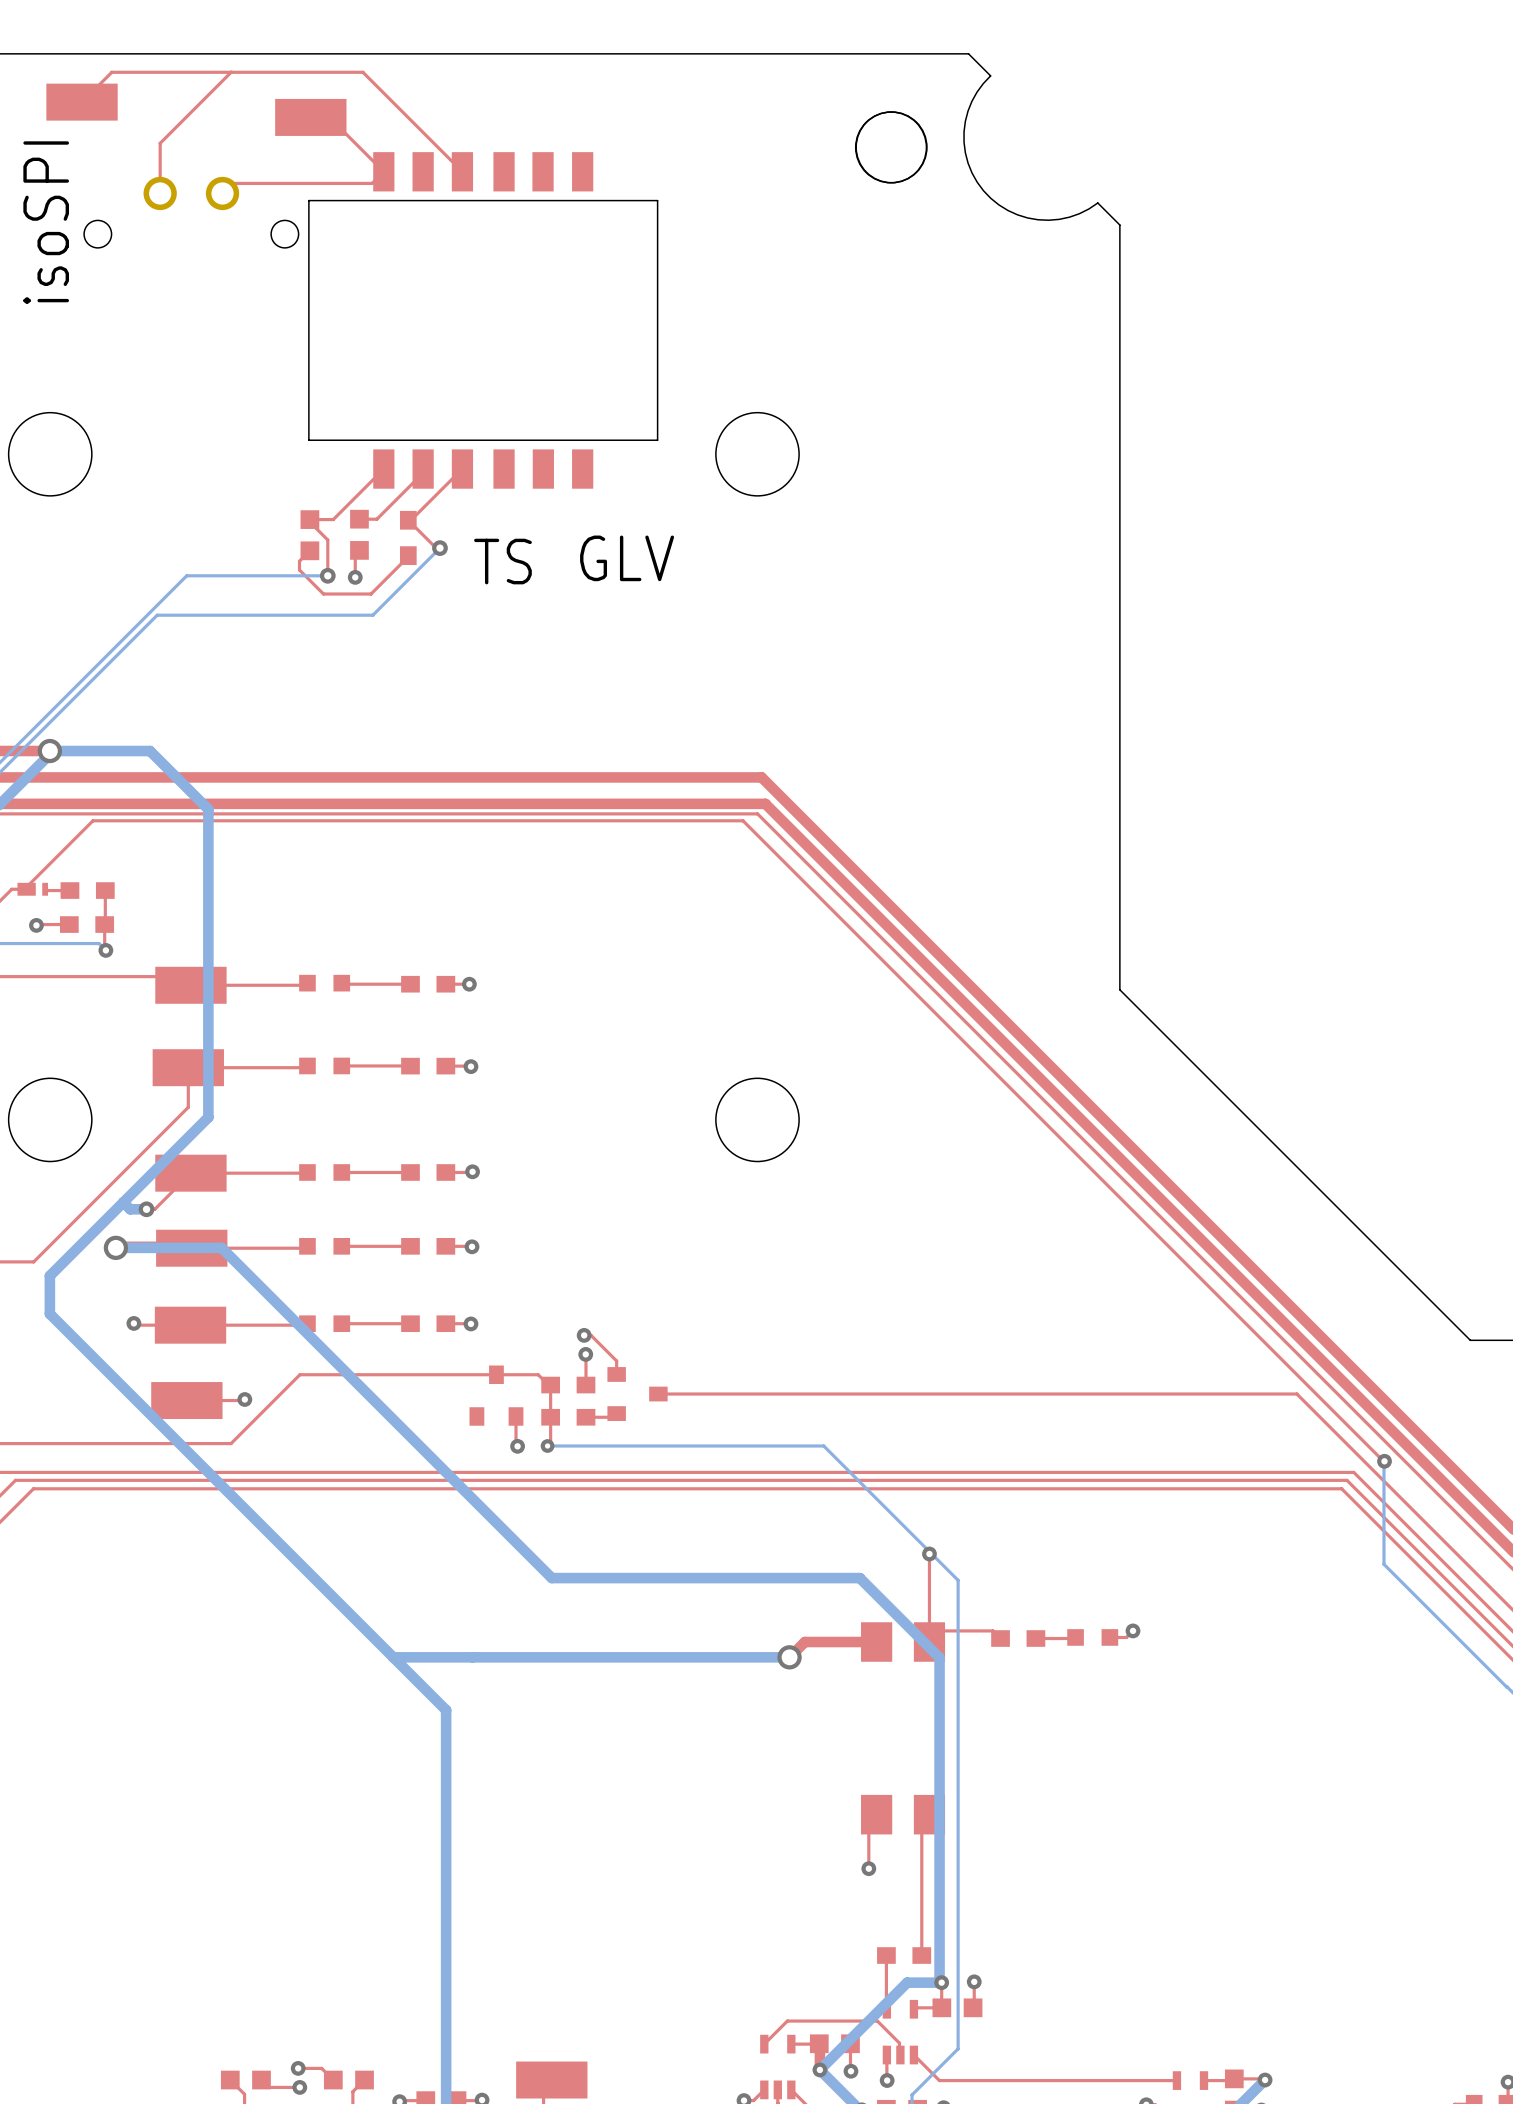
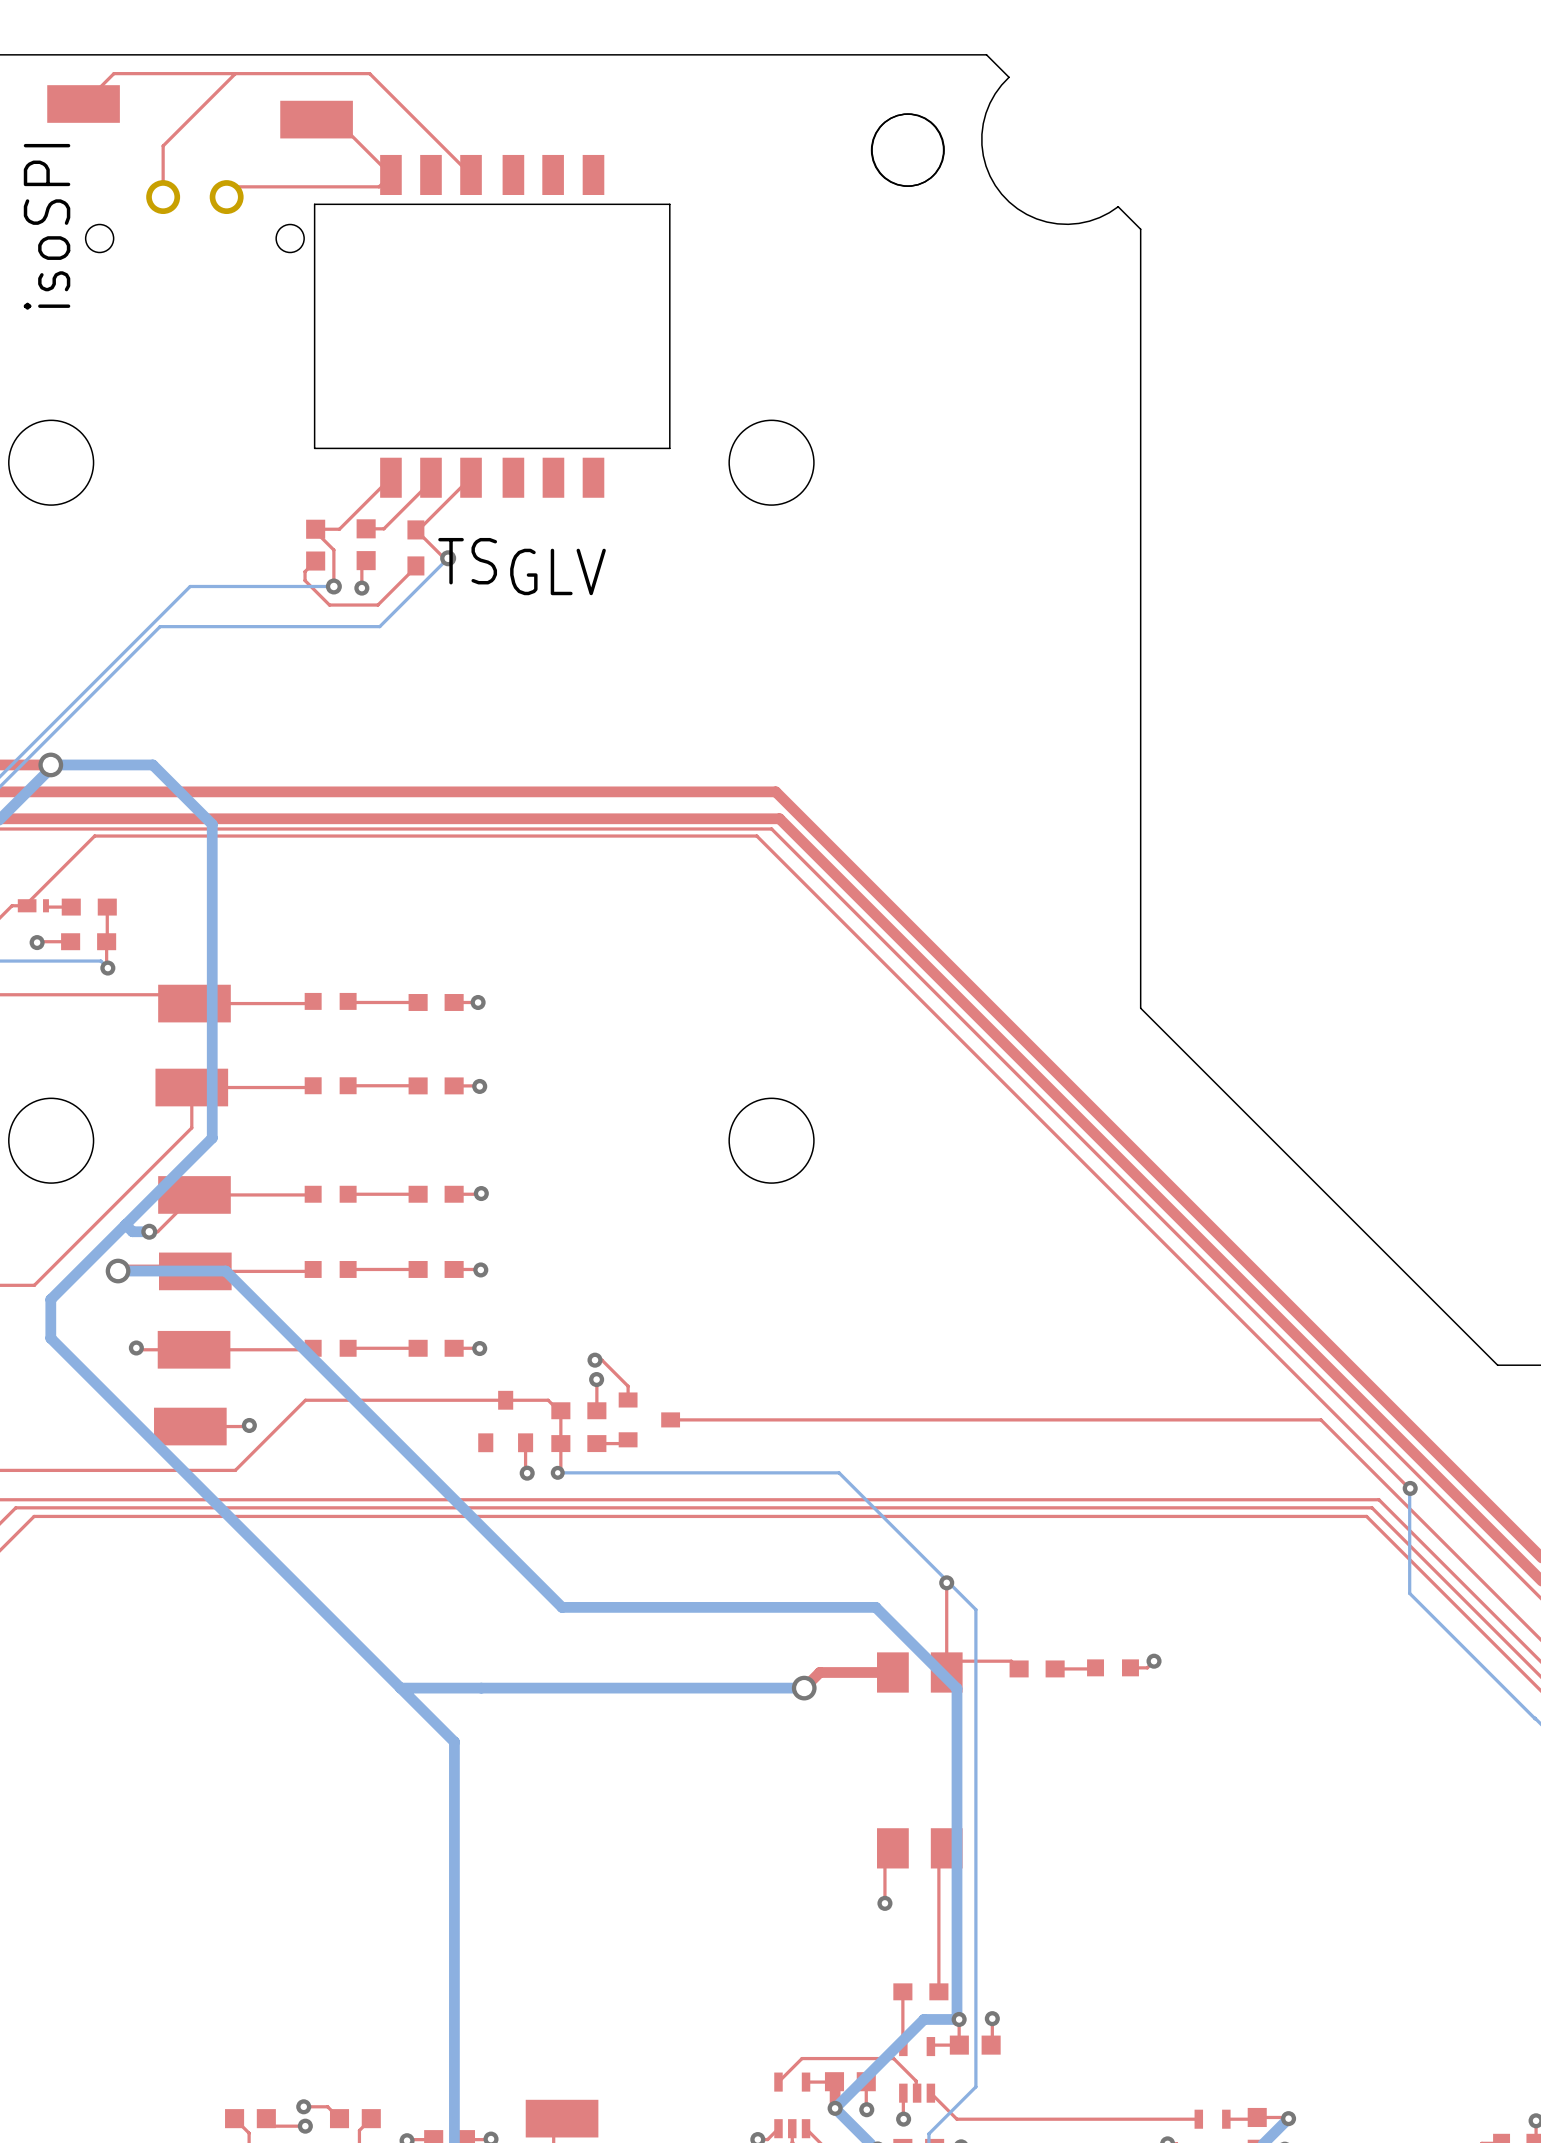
drawing position: (627, 558) -> (557, 571)
drawing position: (502, 561) -> (467, 561)

